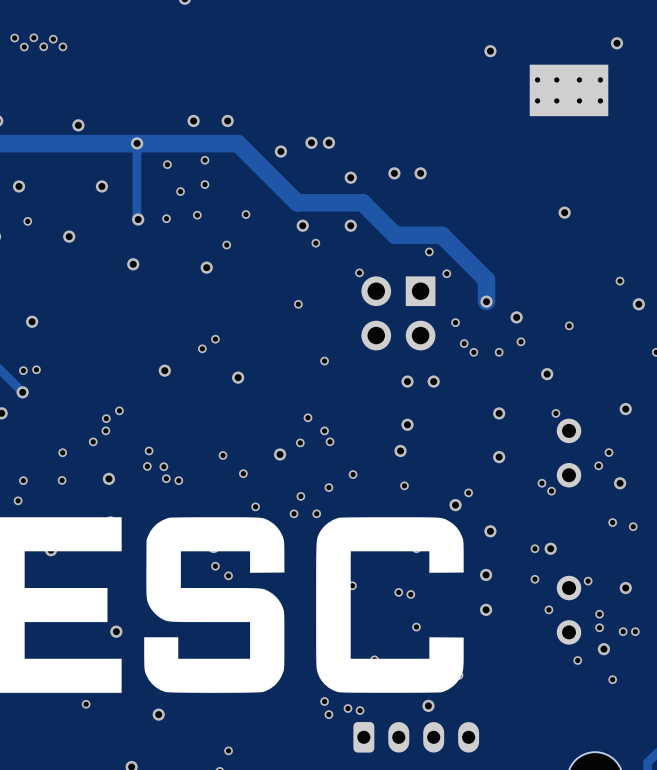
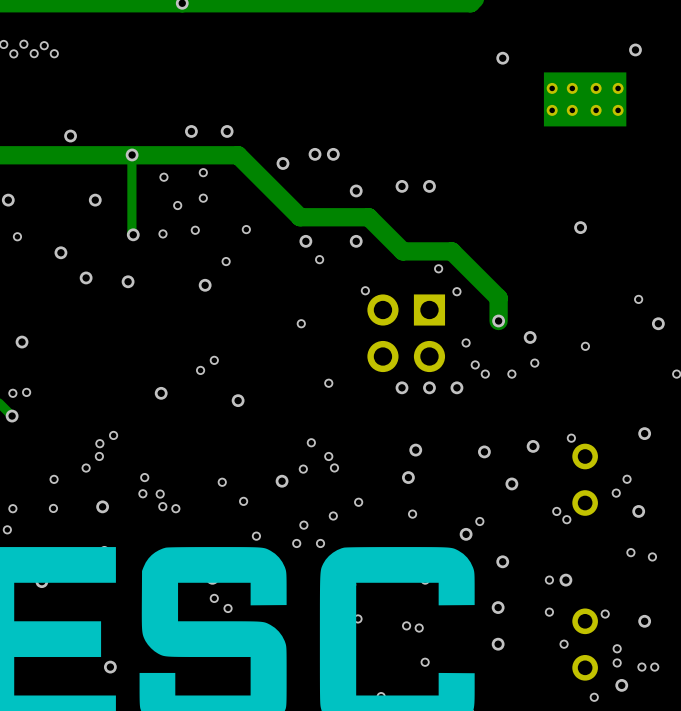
via: none -> (86, 277)
via: none -> (402, 387)
via: none -> (429, 387)
via: none -> (456, 387)
via: (547, 374) -> none
via: (407, 381) -> none
via: (433, 381) -> none
via: (499, 413) -> none
via: none -> (533, 446)
via: none -> (484, 451)

